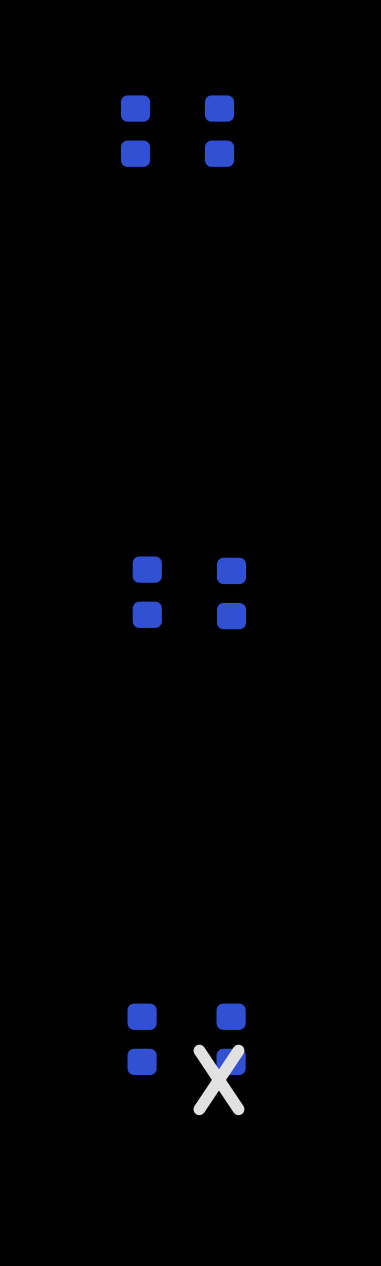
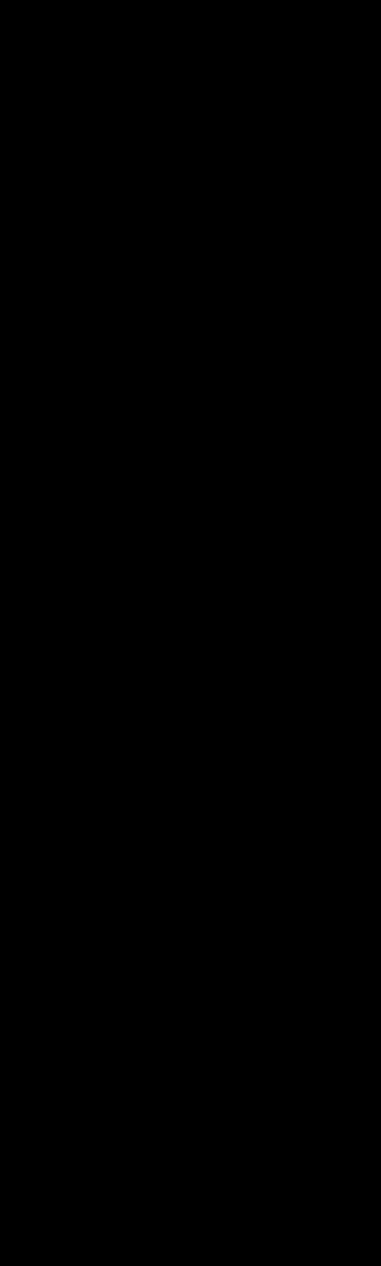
part: (135, 131) -> none
part: (219, 131) -> none
part: (147, 592) -> none
part: (231, 593) -> none
part: (142, 1039) -> none
part: (231, 1039) -> none
text: X (218, 1079) -> none

